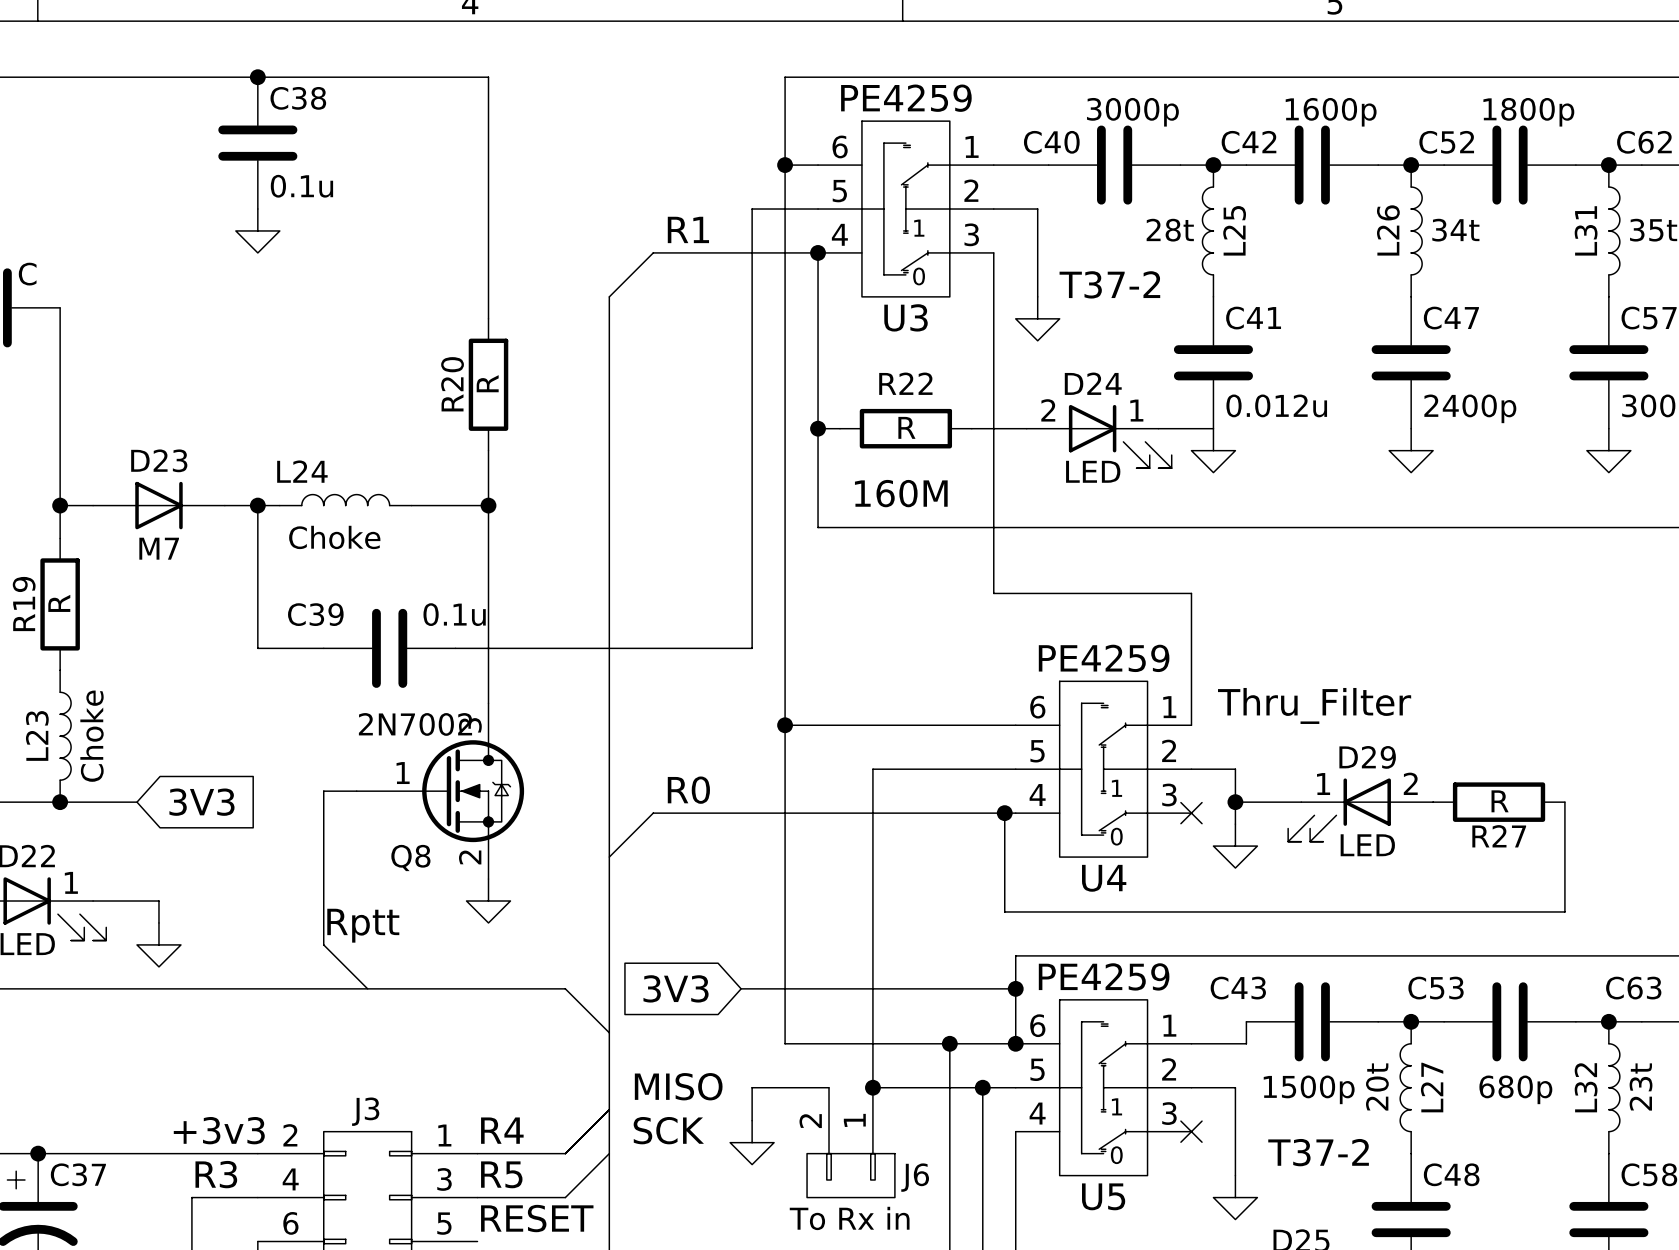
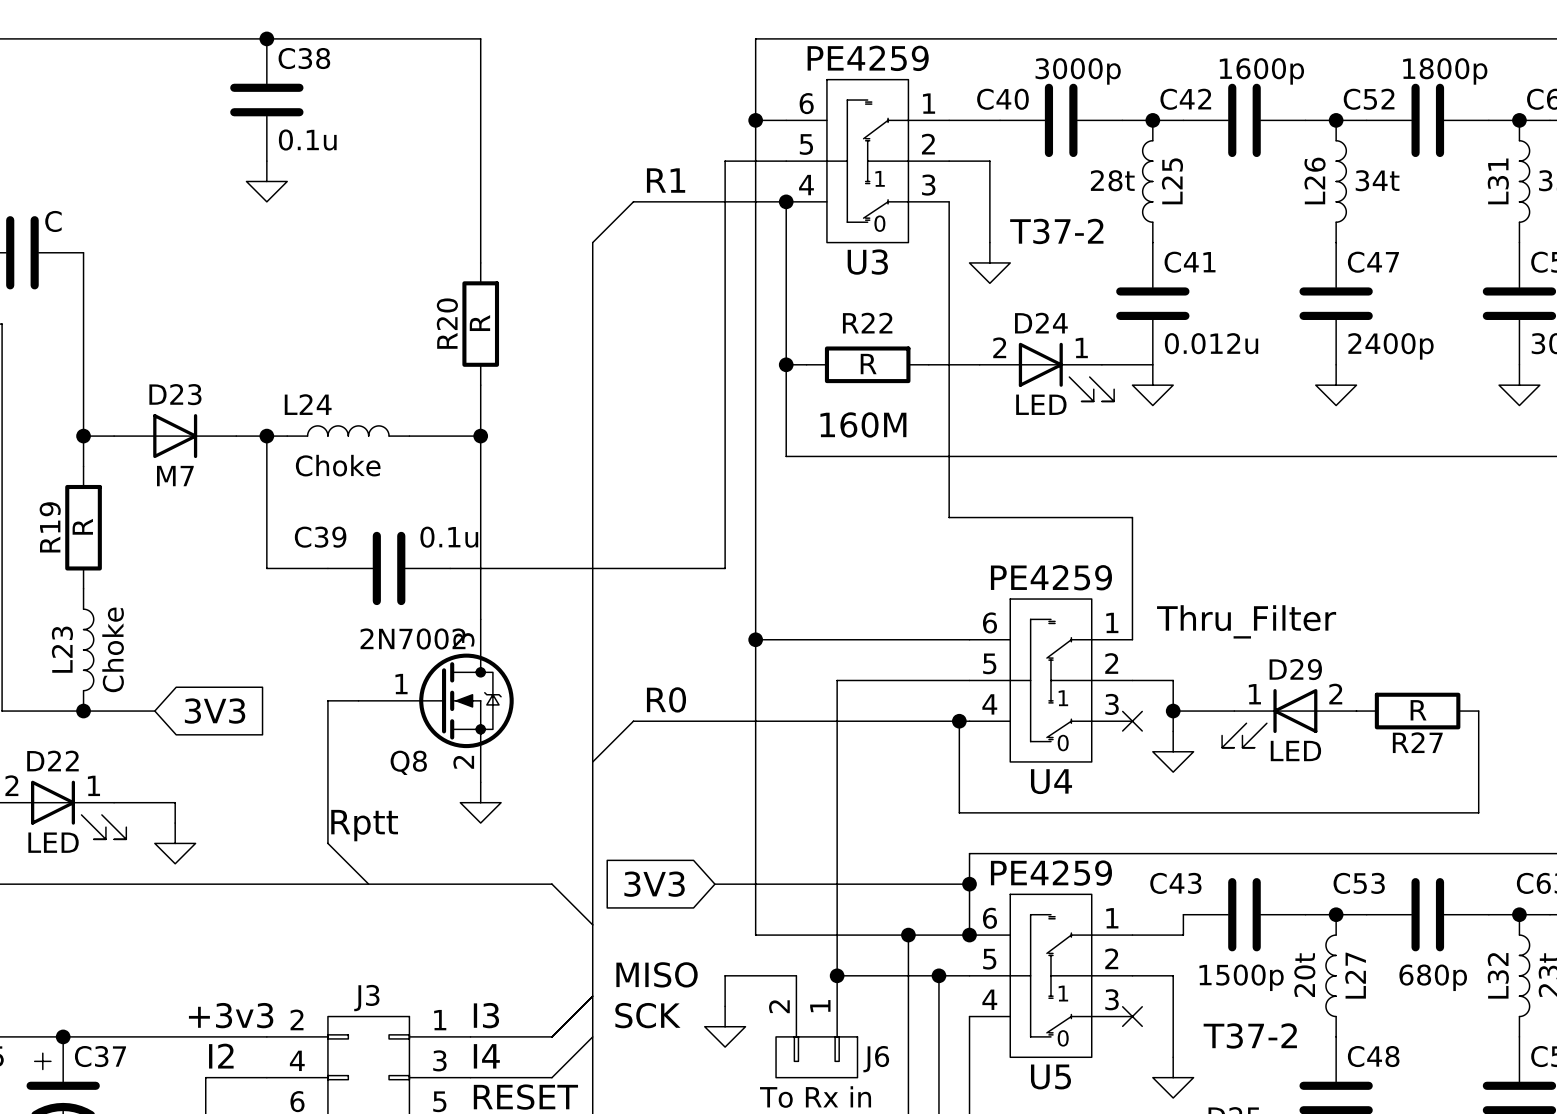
label: R4 (502, 1130) -> I3 (486, 1015)
label: R3 (216, 1174) -> I2 (221, 1056)
label: R5 (501, 1174) -> I4 (486, 1056)

